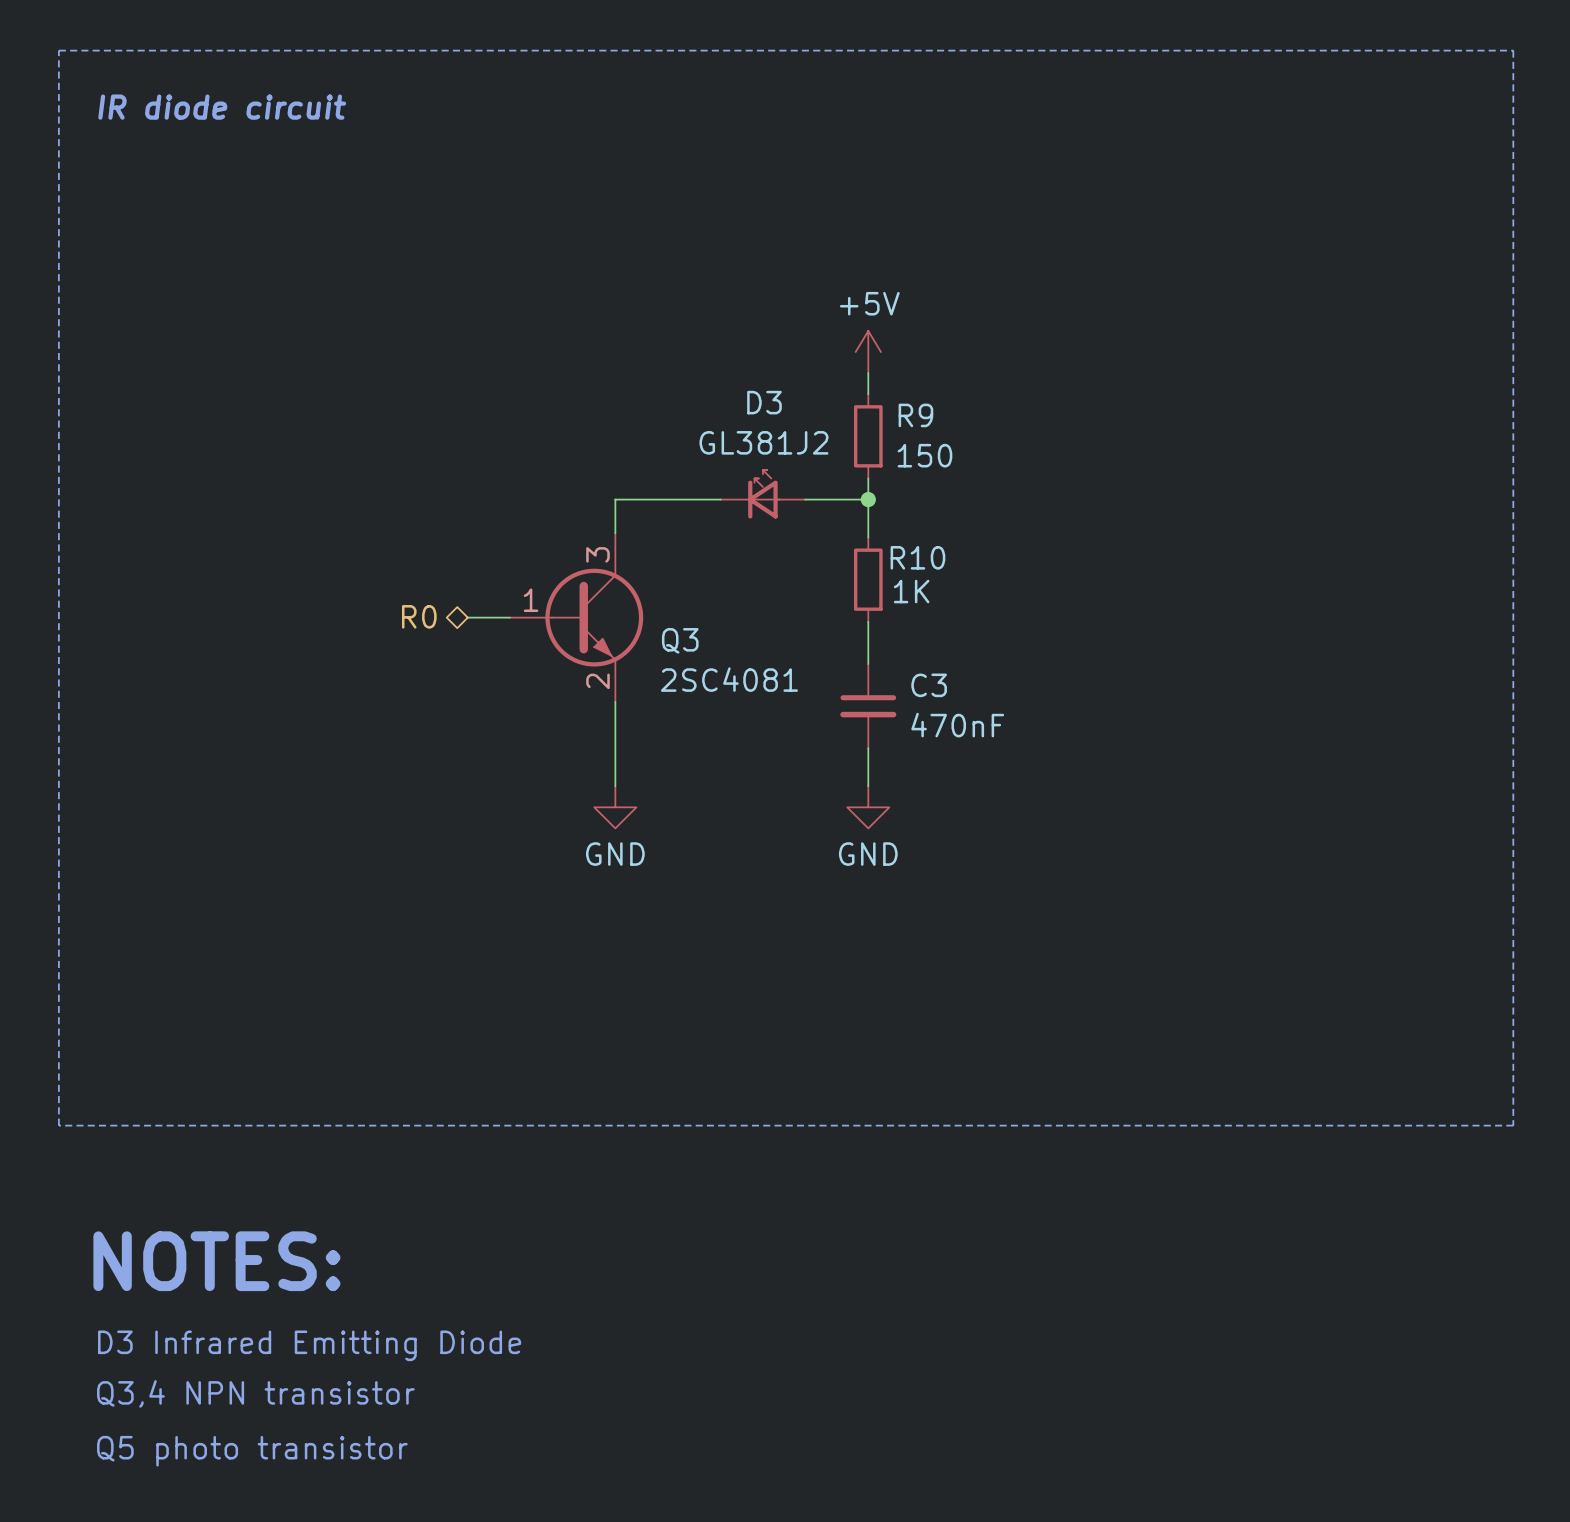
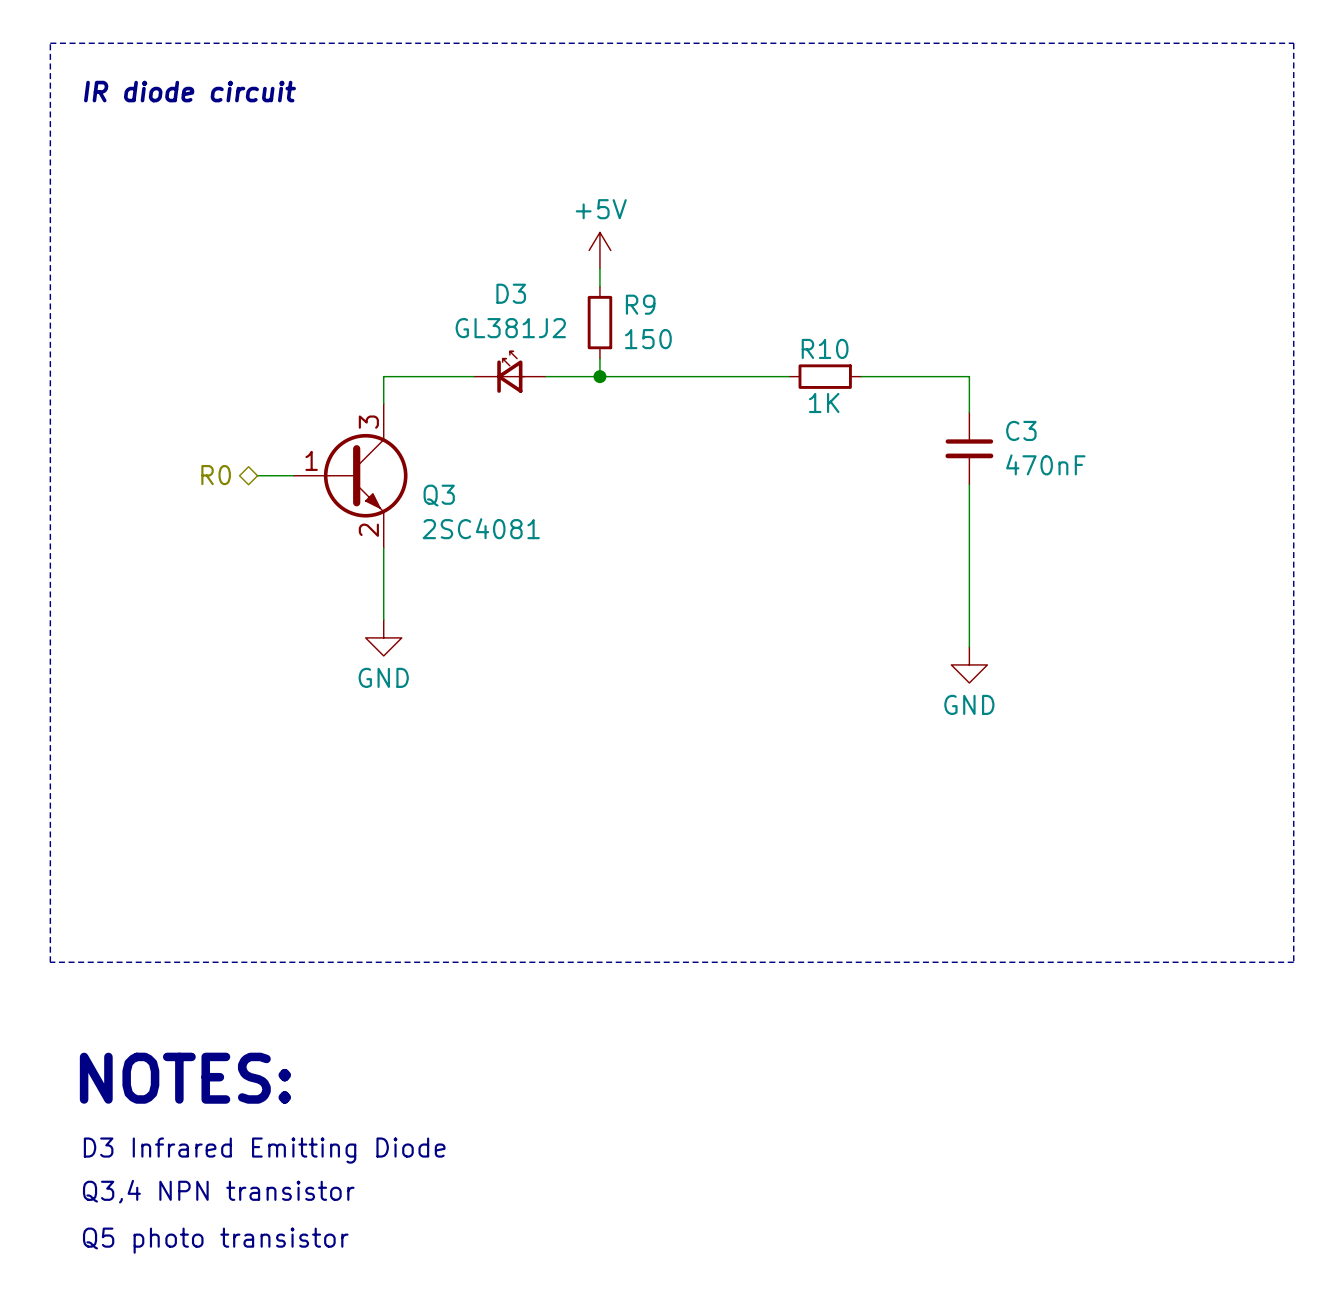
wire: none -> (599, 268) (599, 286)
power symbol position: +5V (868, 352) -> +5V (599, 250)
wire: (868, 373) (868, 394) -> (599, 358) (599, 376)
R9 position: (868, 436) -> (599, 322)
wire: none -> (473, 376) (383, 376) (383, 403)
wire: none -> (545, 376) (789, 376)
junction: none -> (599, 376)
wire: none -> (861, 376) (969, 376) (969, 412)
wire: (868, 478) (868, 537) -> none
D3 position: (762, 494) -> (509, 372)
wire: (720, 499) (615, 499) (615, 533) -> none
wire: (805, 499) (868, 499) -> none
junction: (868, 499) -> none
R10 name position: R10 (917, 557) -> R10 (825, 348)
wire: none -> (969, 484) (969, 646)
R10 rotation: 0° (868, 579) -> 90° clockwise (825, 376)
R10 position: (868, 579) -> (825, 376)
hierarchical label position: R0 (419, 616) -> R0 (216, 475)
wire: (467, 617) (509, 617) -> (257, 475) (293, 475)
Q3 position: (576, 617) -> (350, 475)
wire: (868, 621) (868, 663) -> none
wire: (615, 701) (615, 786) -> (383, 547) (383, 619)
C3 position: (868, 706) -> (969, 448)
wire: (868, 748) (868, 786) -> none
power symbol: none -> GND (969, 664)
power symbol position: GND (615, 807) -> GND (383, 637)
power symbol: GND (868, 807) -> none

